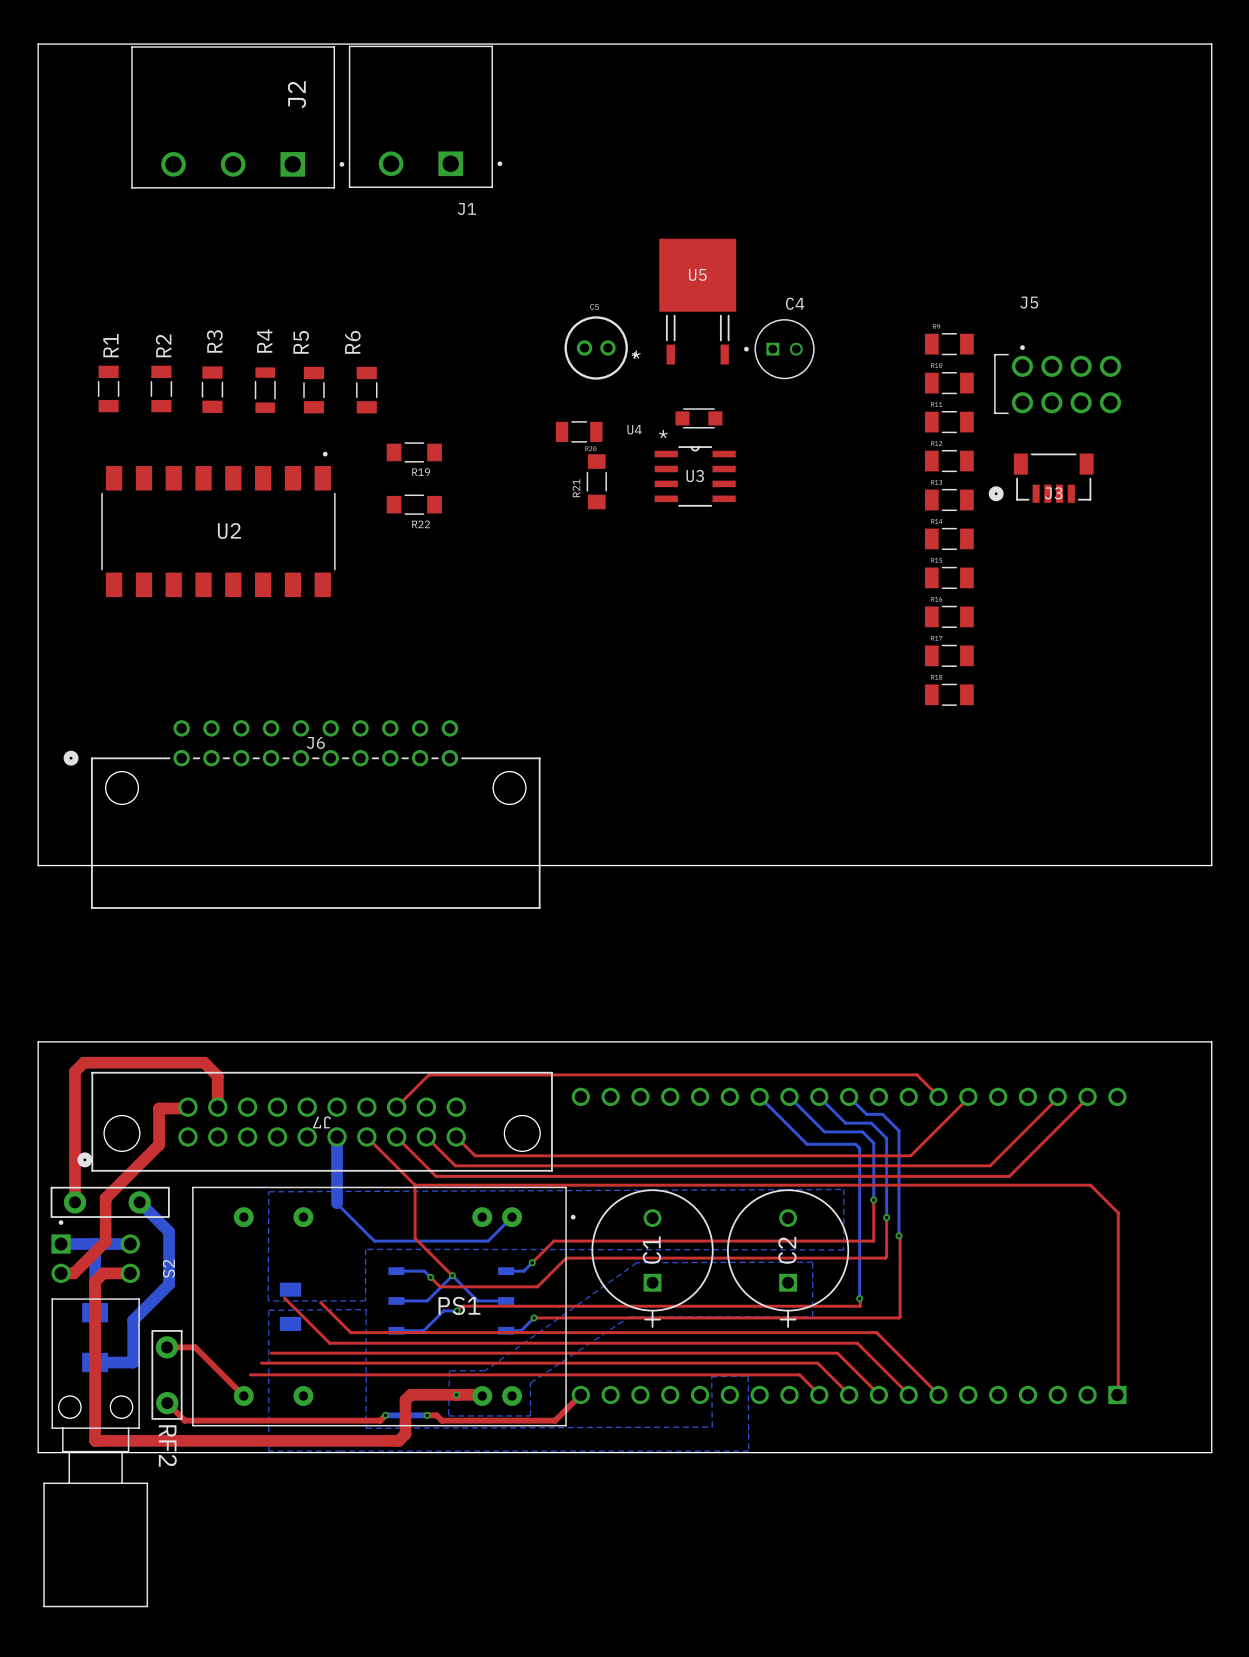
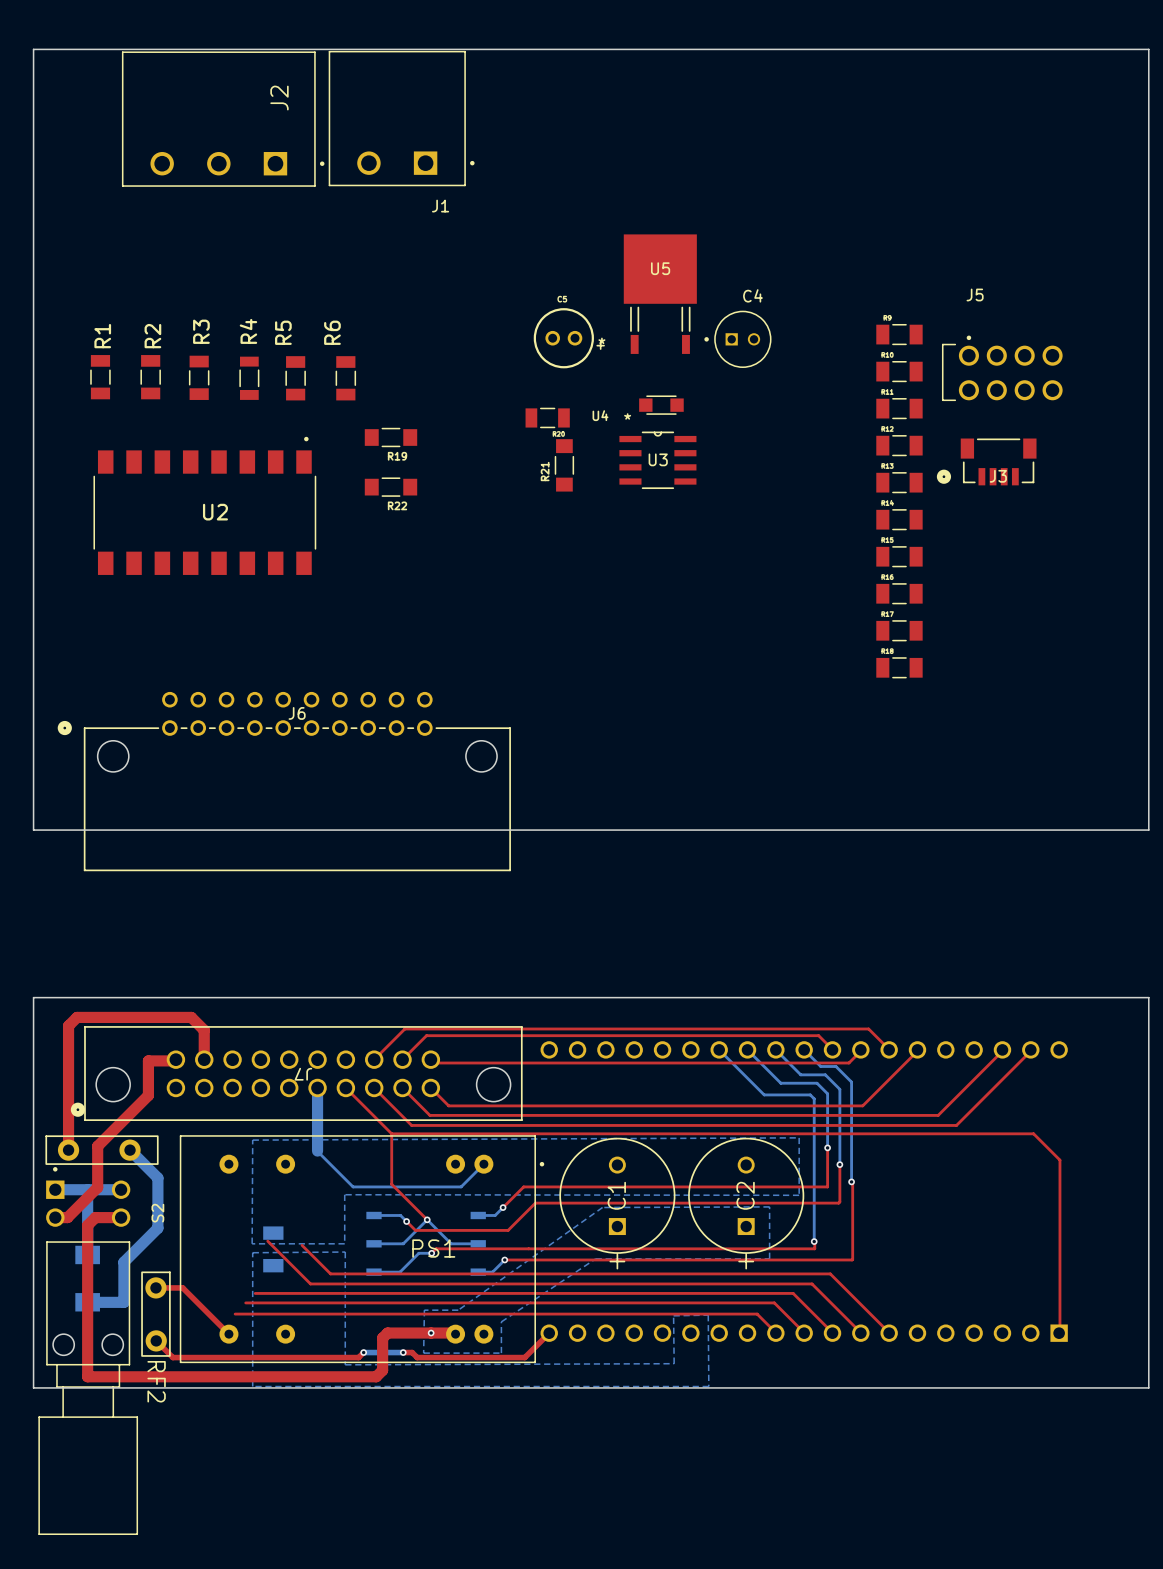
top track: none -> (833, 1050) (818, 1035) (426, 1035) (402, 1059)
top track: none -> (861, 1050) (848, 1063) (434, 1063) (431, 1059)

